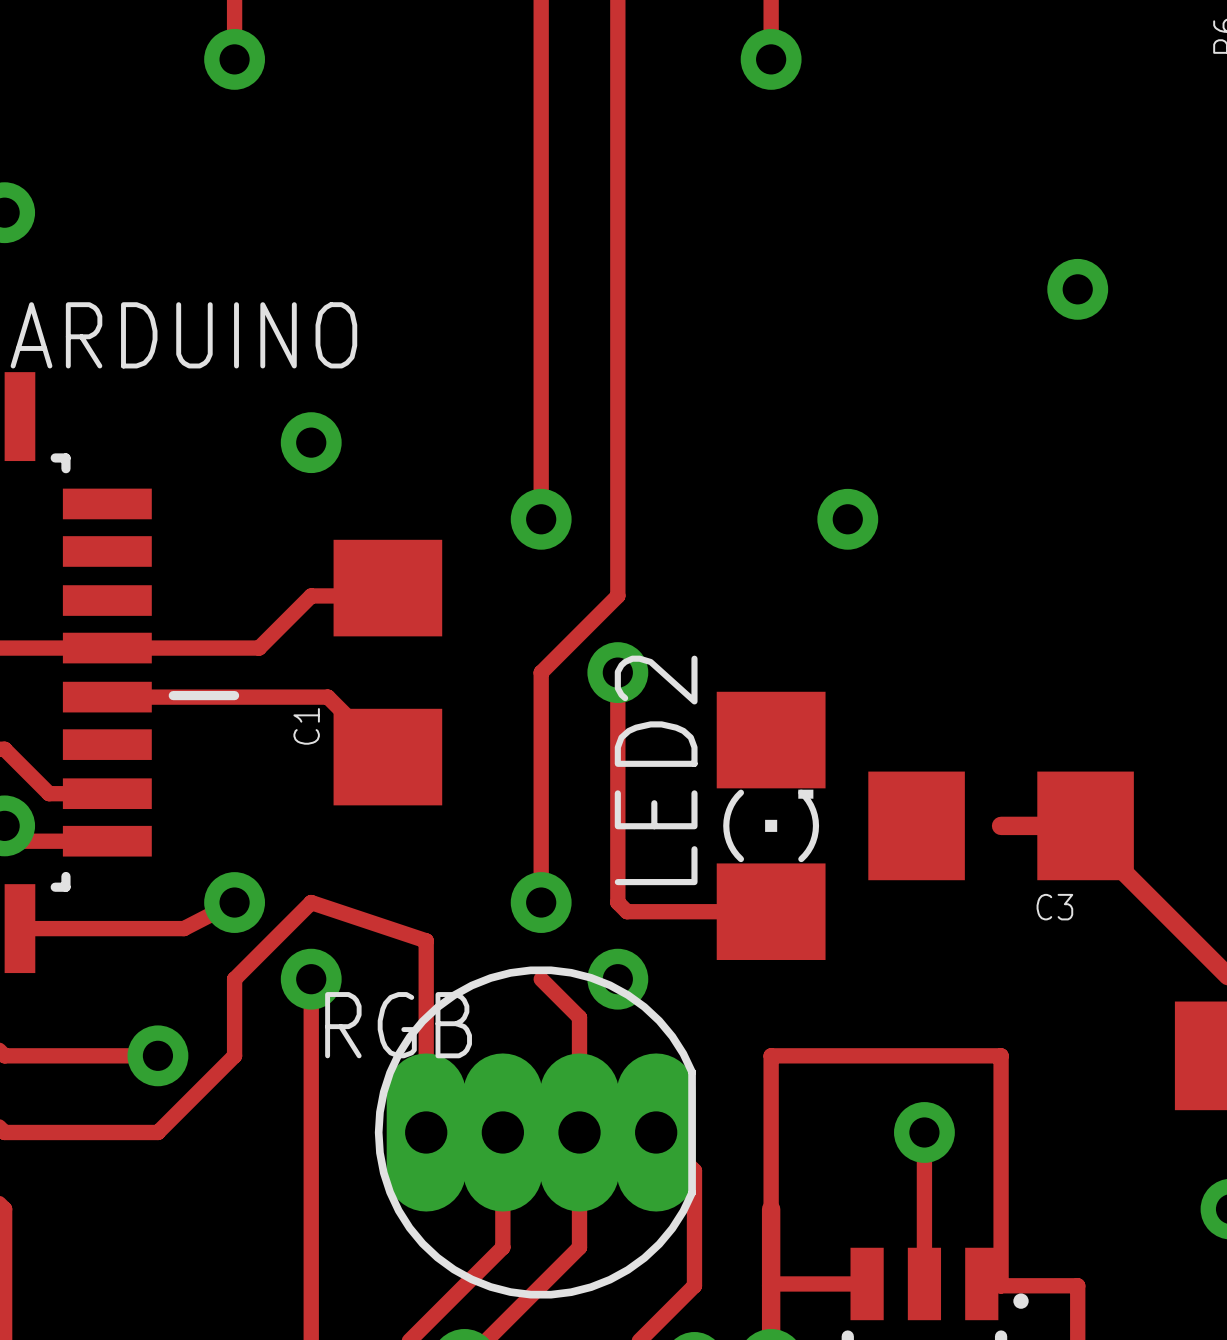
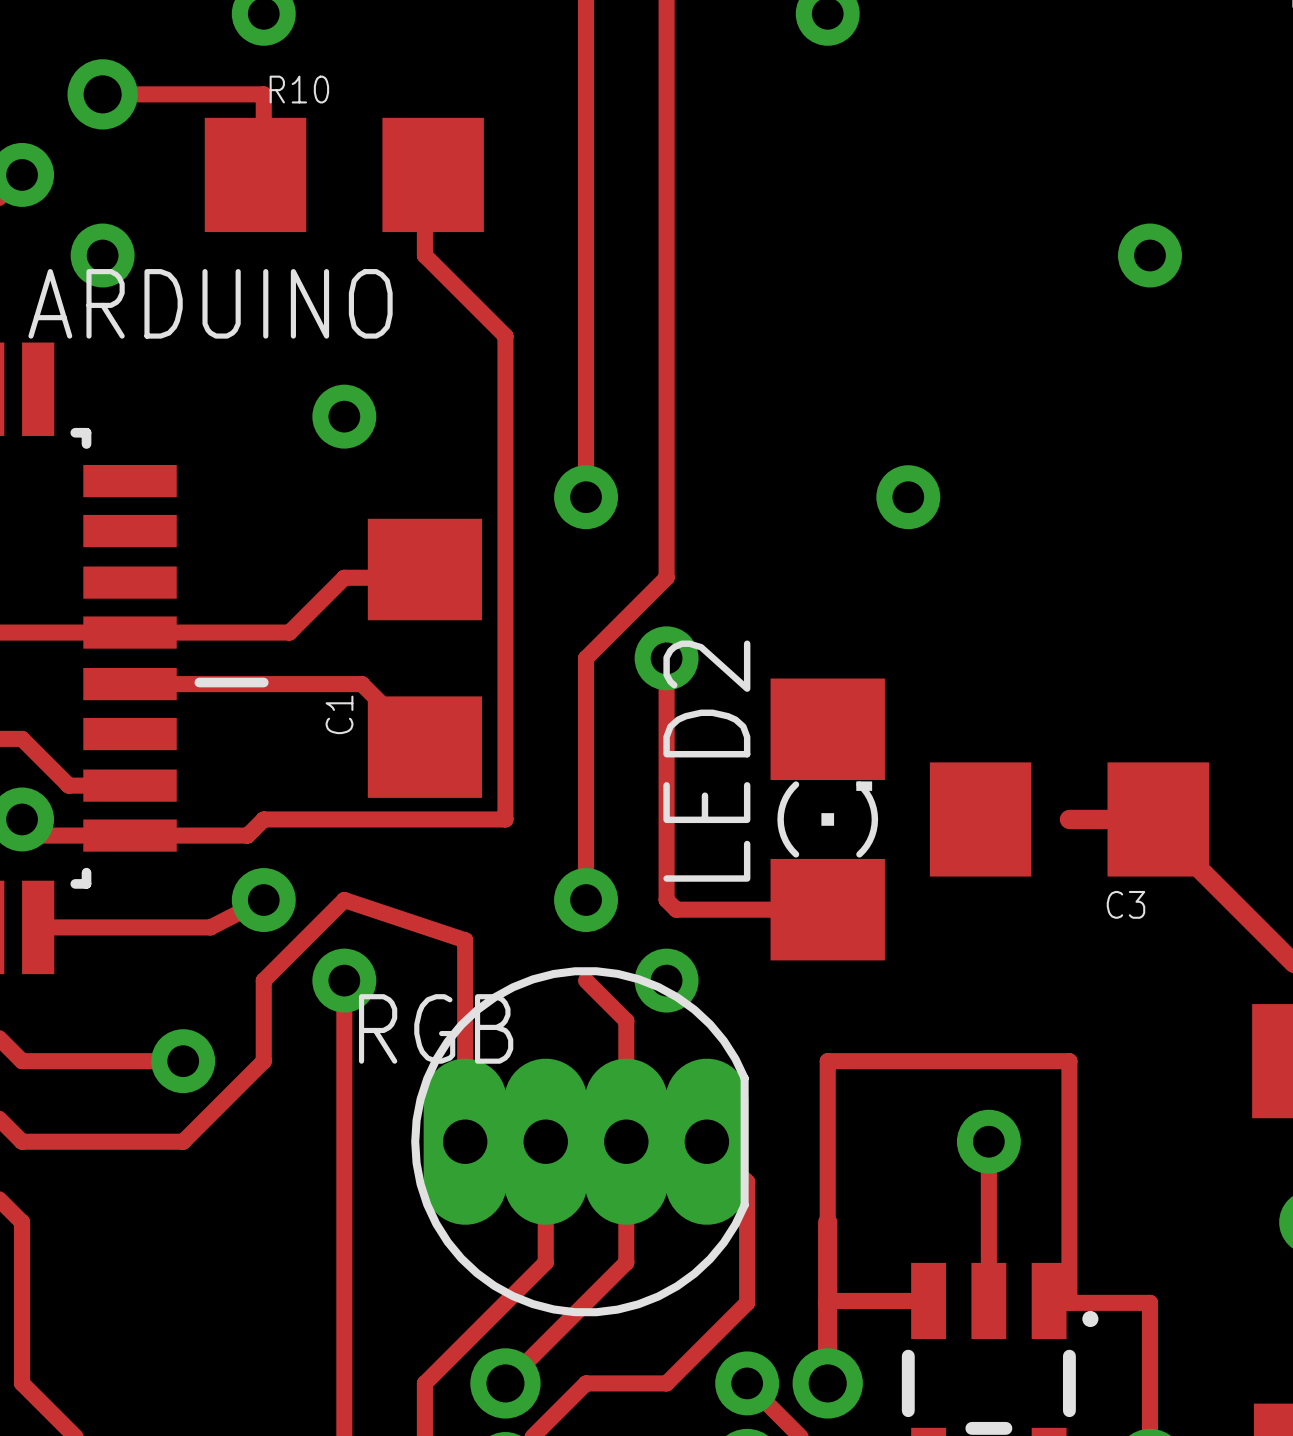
track: none -> (102, 94) (263, 94) (263, 174) (255, 174)
via: none -> (102, 94)
R10: none -> (344, 174)
track: none -> (433, 174) (424, 174) (424, 255) (505, 336) (505, 819) (263, 819) (247, 835) (130, 835)
via: none -> (102, 255)

